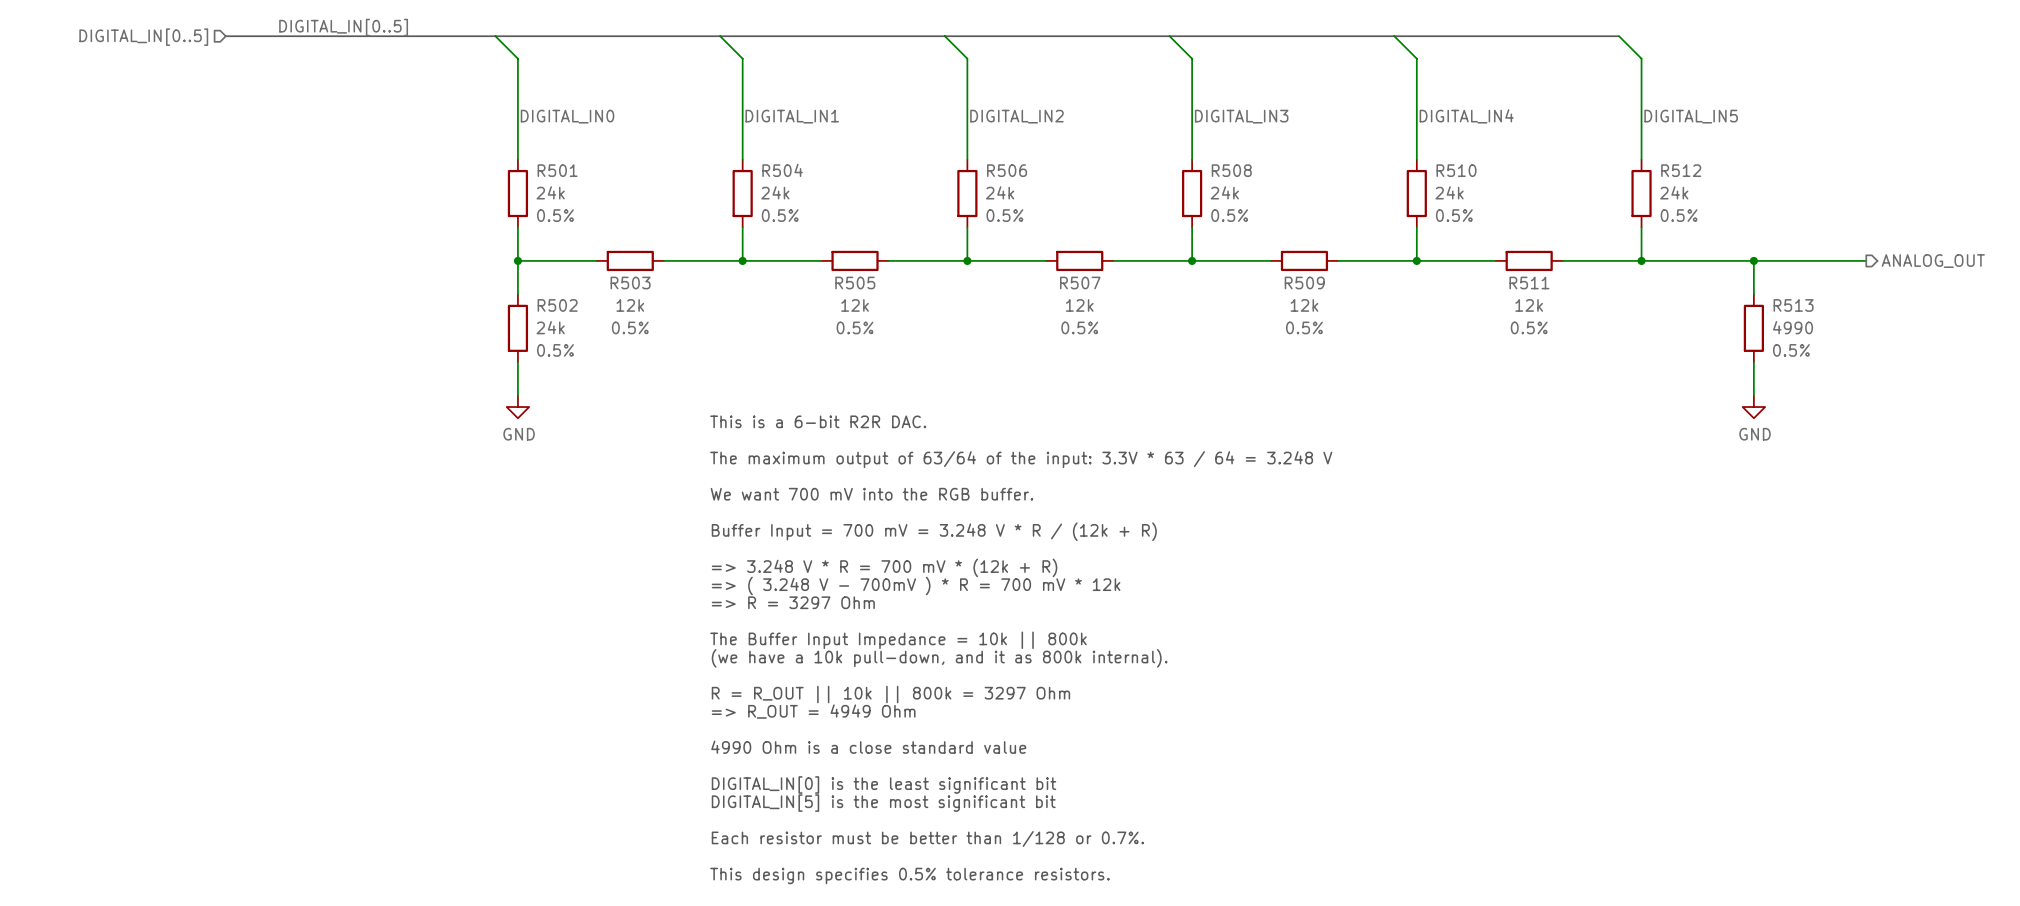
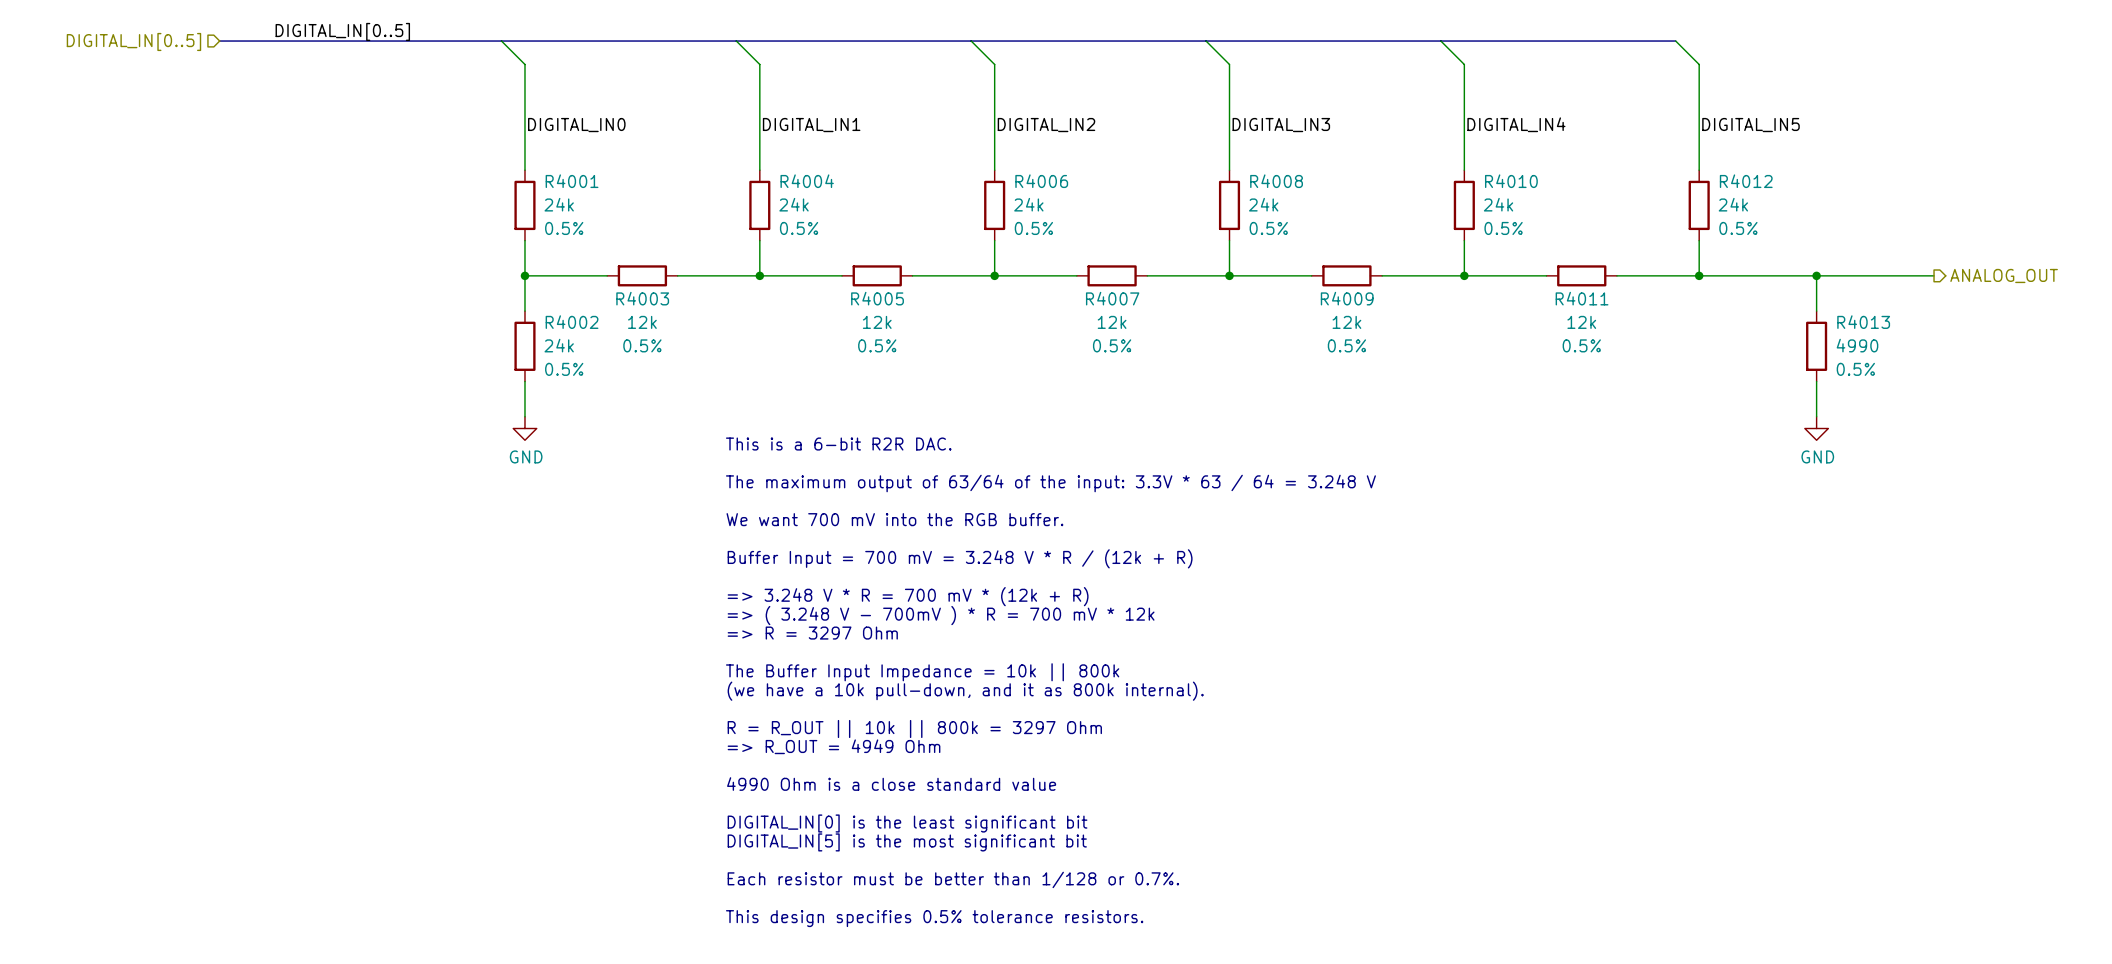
R501 name: R501 (557, 170) -> R4001 (572, 181)
R504 name: R504 (782, 170) -> R4004 (807, 181)
R506 name: R506 (1007, 170) -> R4006 (1041, 181)
R508 name: R508 (1231, 170) -> R4008 (1276, 181)
R510 name: R510 (1456, 170) -> R4010 (1511, 181)
R512 name: R512 (1681, 170) -> R4012 (1746, 181)
R503 name: R503 (630, 282) -> R4003 (642, 298)
R505 name: R505 (855, 282) -> R4005 (877, 298)
R507 name: R507 (1080, 282) -> R4007 (1112, 298)
R509 name: R509 (1304, 282) -> R4009 (1347, 298)
R511 name: R511 (1529, 282) -> R4011 (1582, 298)
R502 name: R502 (557, 305) -> R4002 (572, 322)
R513 name: R513 (1793, 305) -> R4013 (1863, 322)

